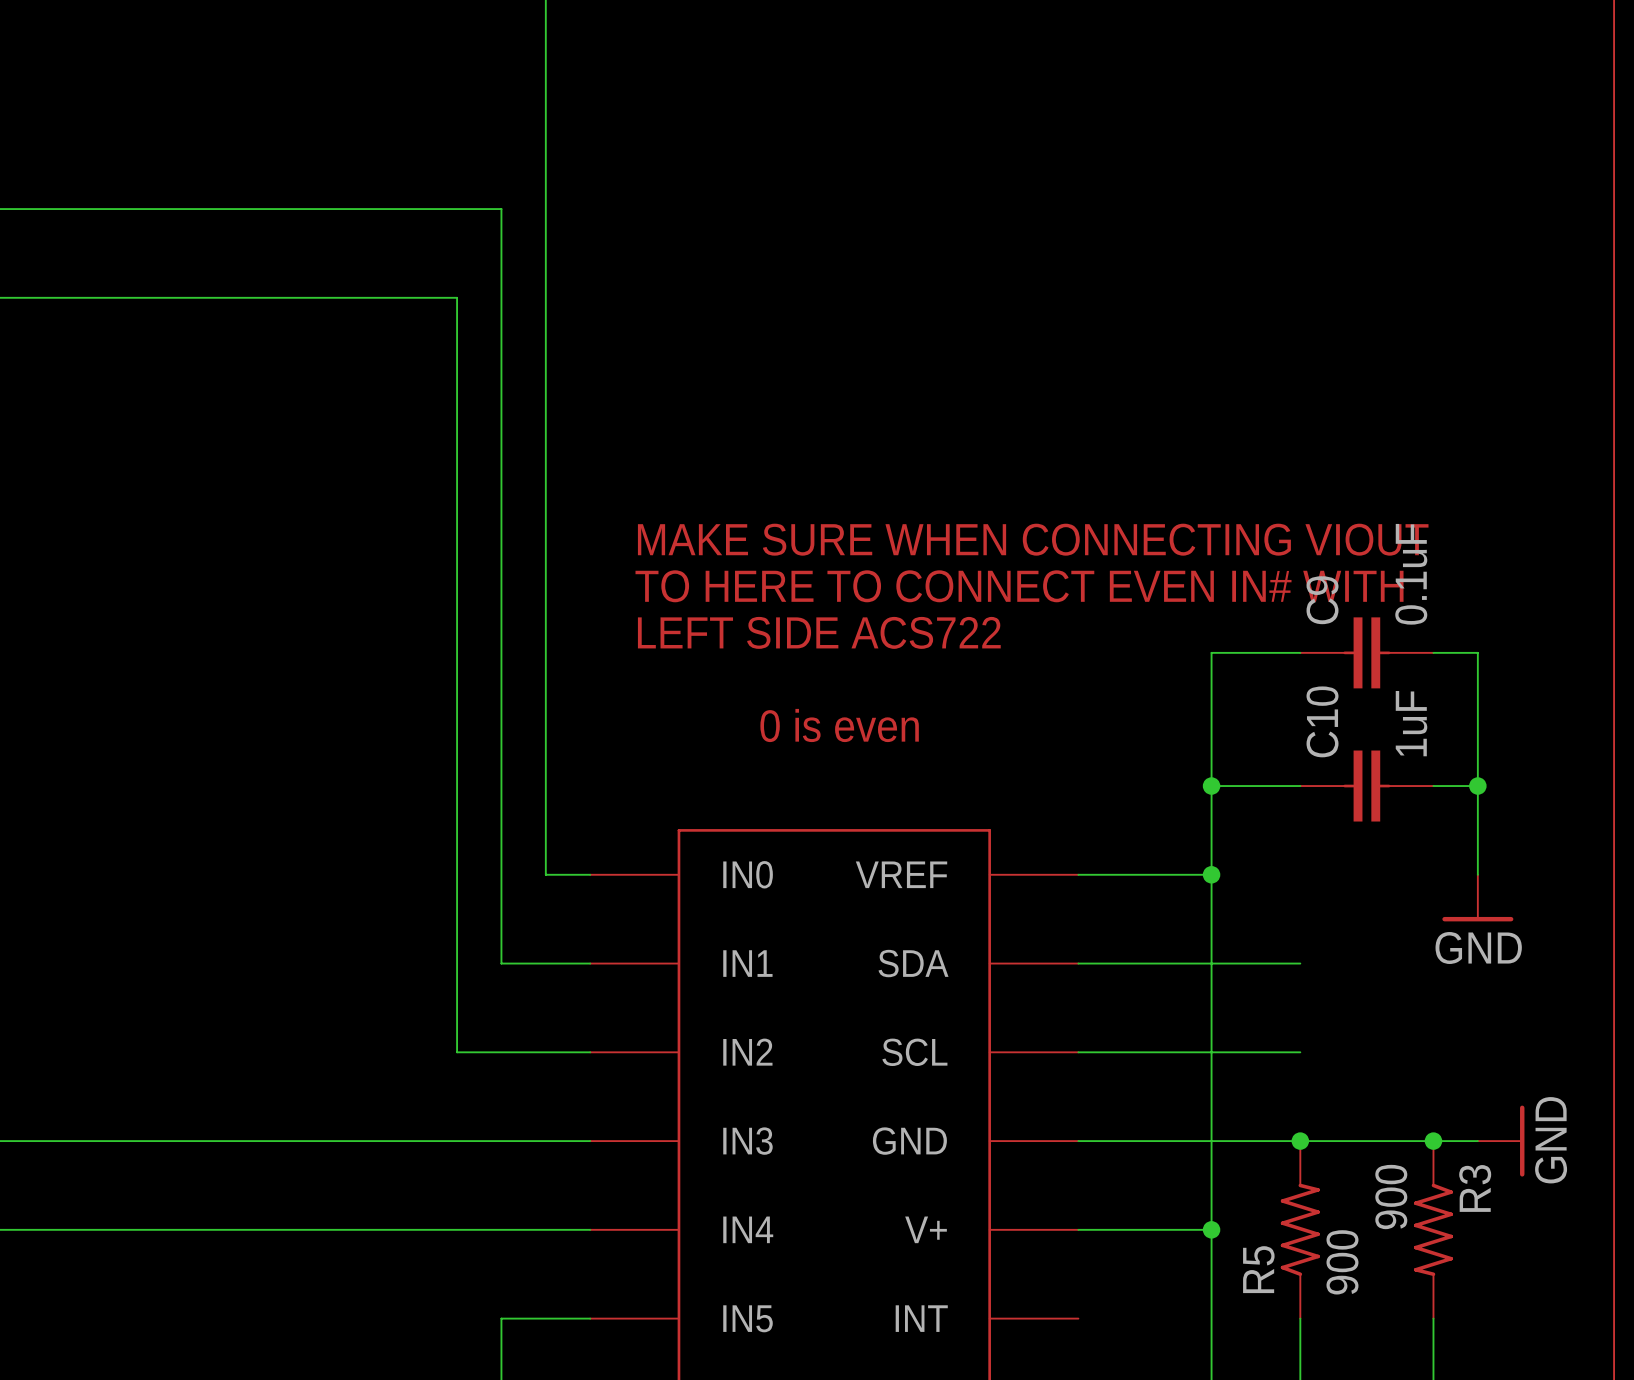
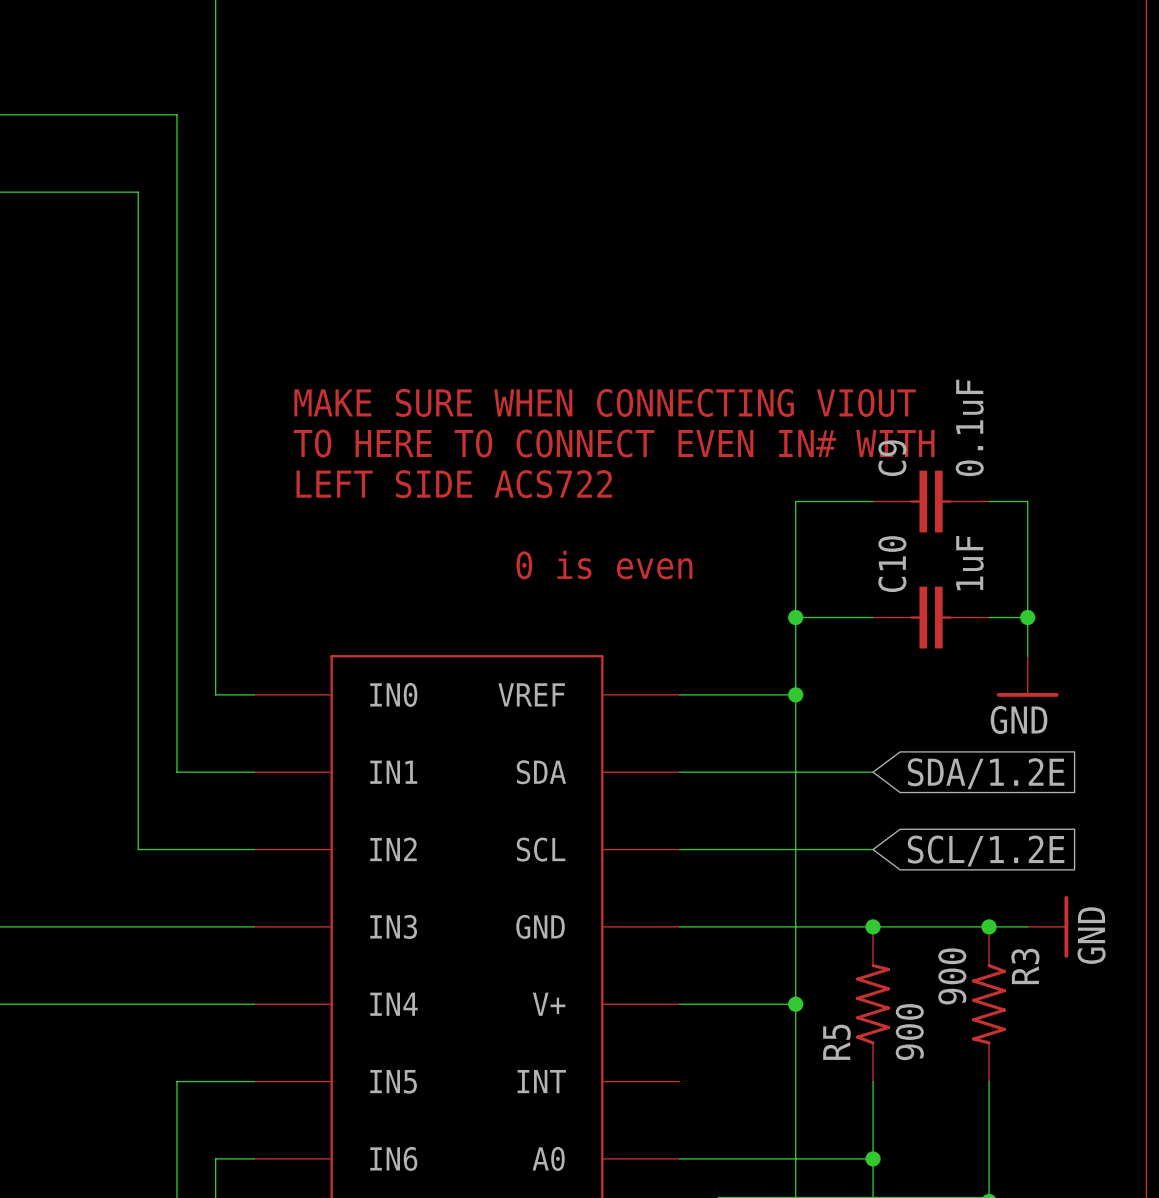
power symbol position: GND (1477, 898) -> GND (1027, 676)
global label: none -> SDA/1.2E (986, 773)
global label: none -> SCL/1.2E (986, 851)

